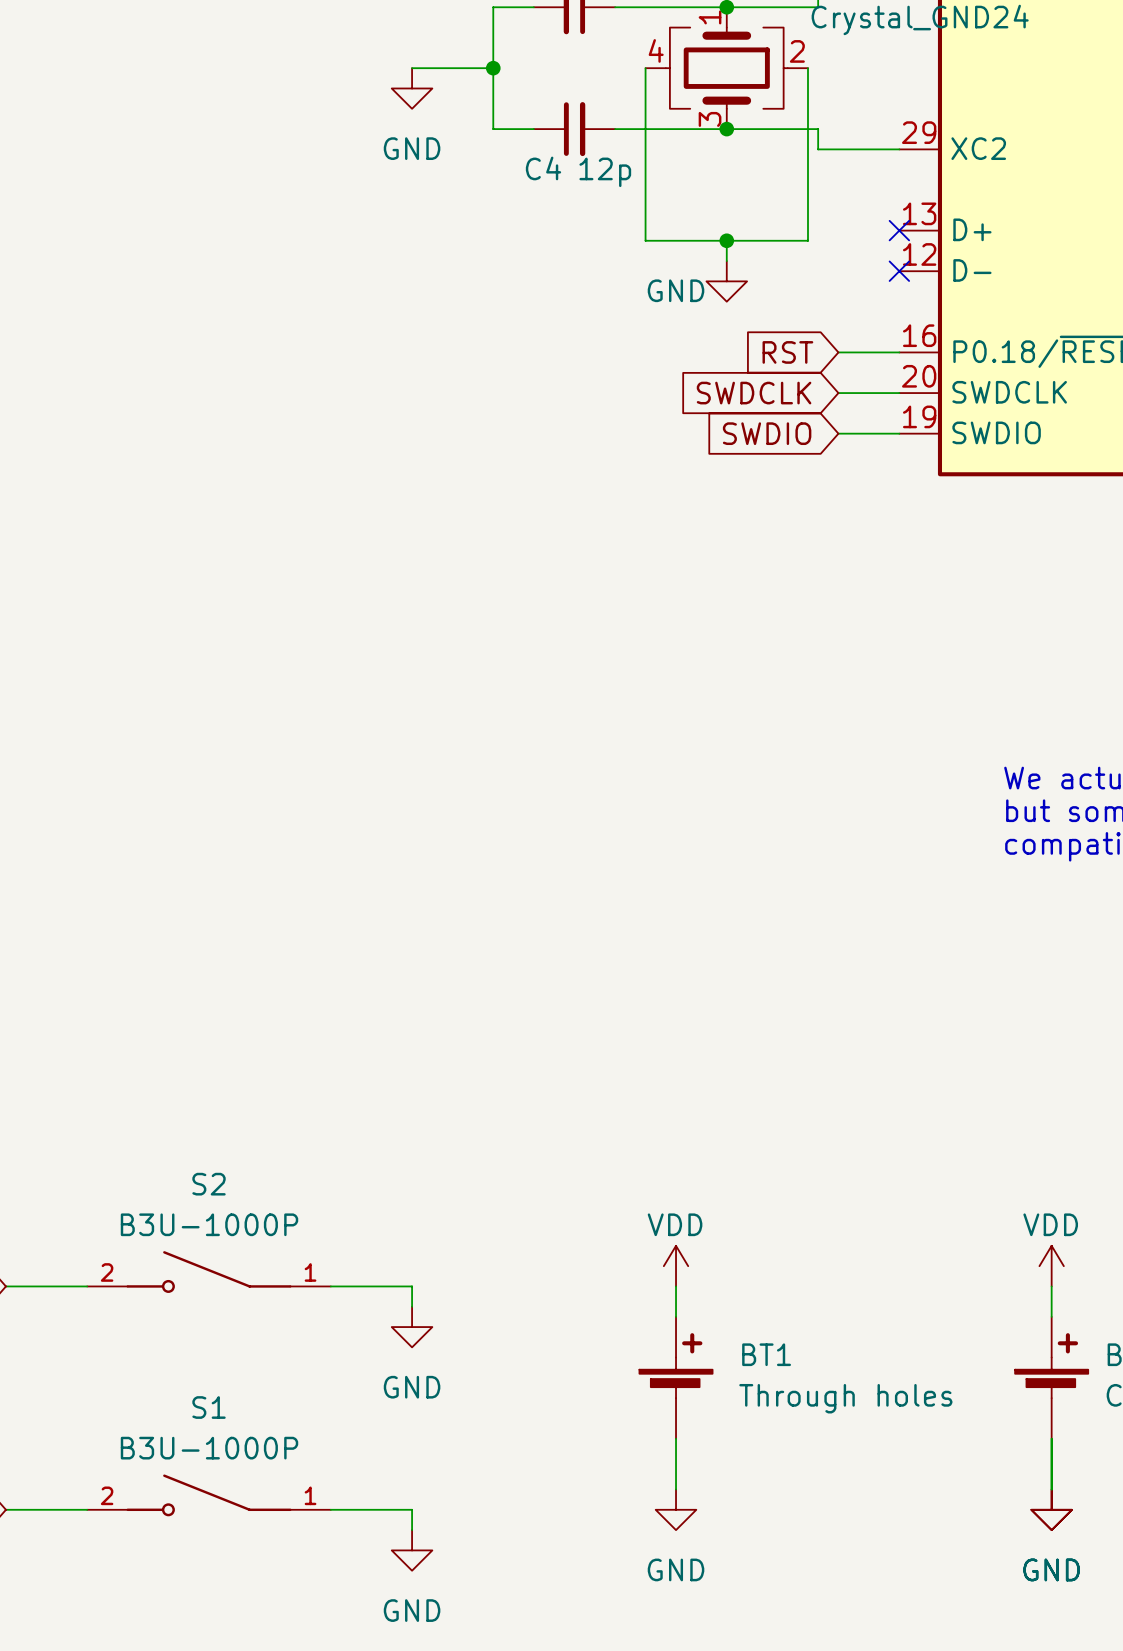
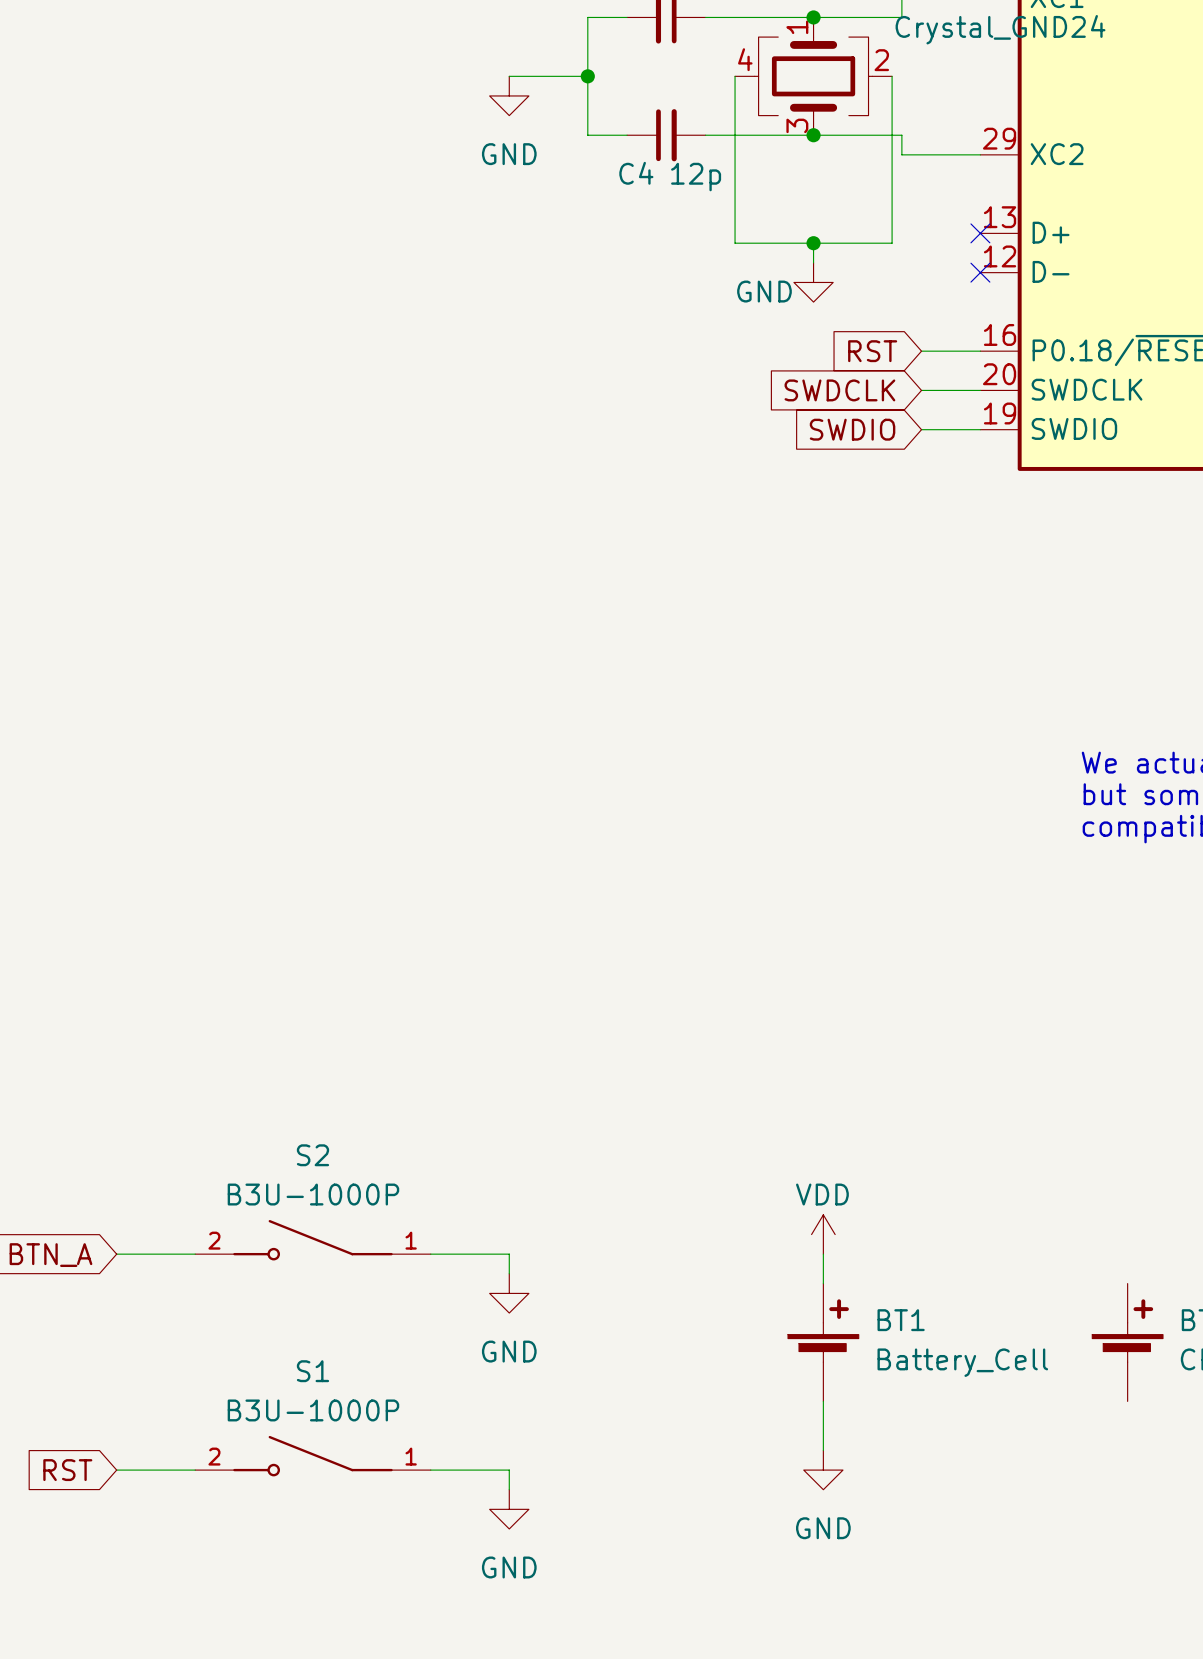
power symbol position: VDD (676, 1266) -> VDD (823, 1234)
power symbol: VDD (1051, 1266) -> none
wire: (676, 1286) (676, 1316) -> (823, 1254) (823, 1283)
wire: (1051, 1286) (1051, 1316) -> none
BT1 name position: BT1 (766, 1354) -> BT1 (901, 1320)
BT1 position: (676, 1377) -> (823, 1342)
BT1 value: Through holes (845, 1398) -> Battery_Cell (962, 1362)
wire: (676, 1438) (676, 1489) -> (823, 1401) (823, 1450)
wire: (1051, 1438) (1051, 1489) -> none
power symbol position: GND (676, 1509) -> GND (823, 1470)
power symbol: GND (1051, 1509) -> none

